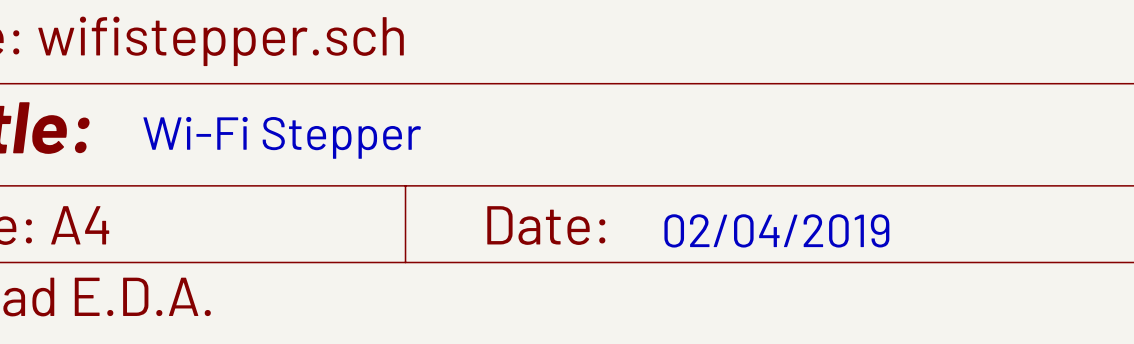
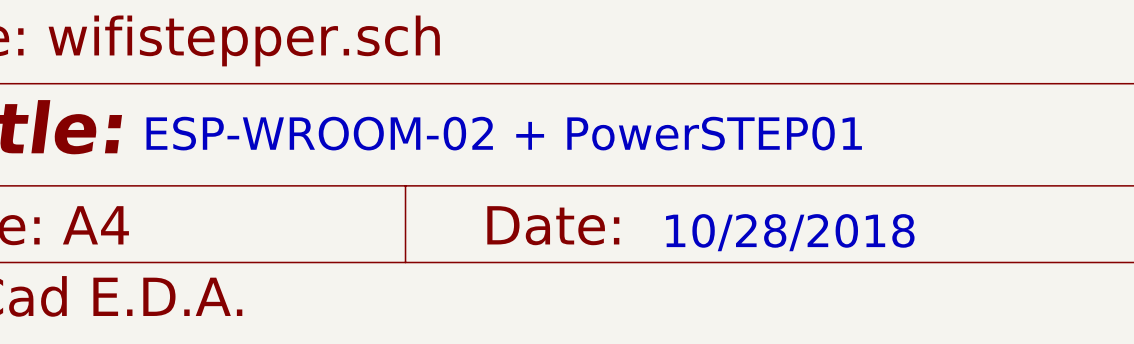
text: Wi-Fi Stepper (282, 137) -> ESP-WROOM-02 + PowerSTEP01 (504, 133)
text: 02/04/2019 (776, 230) -> 10/28/2018 (790, 232)

